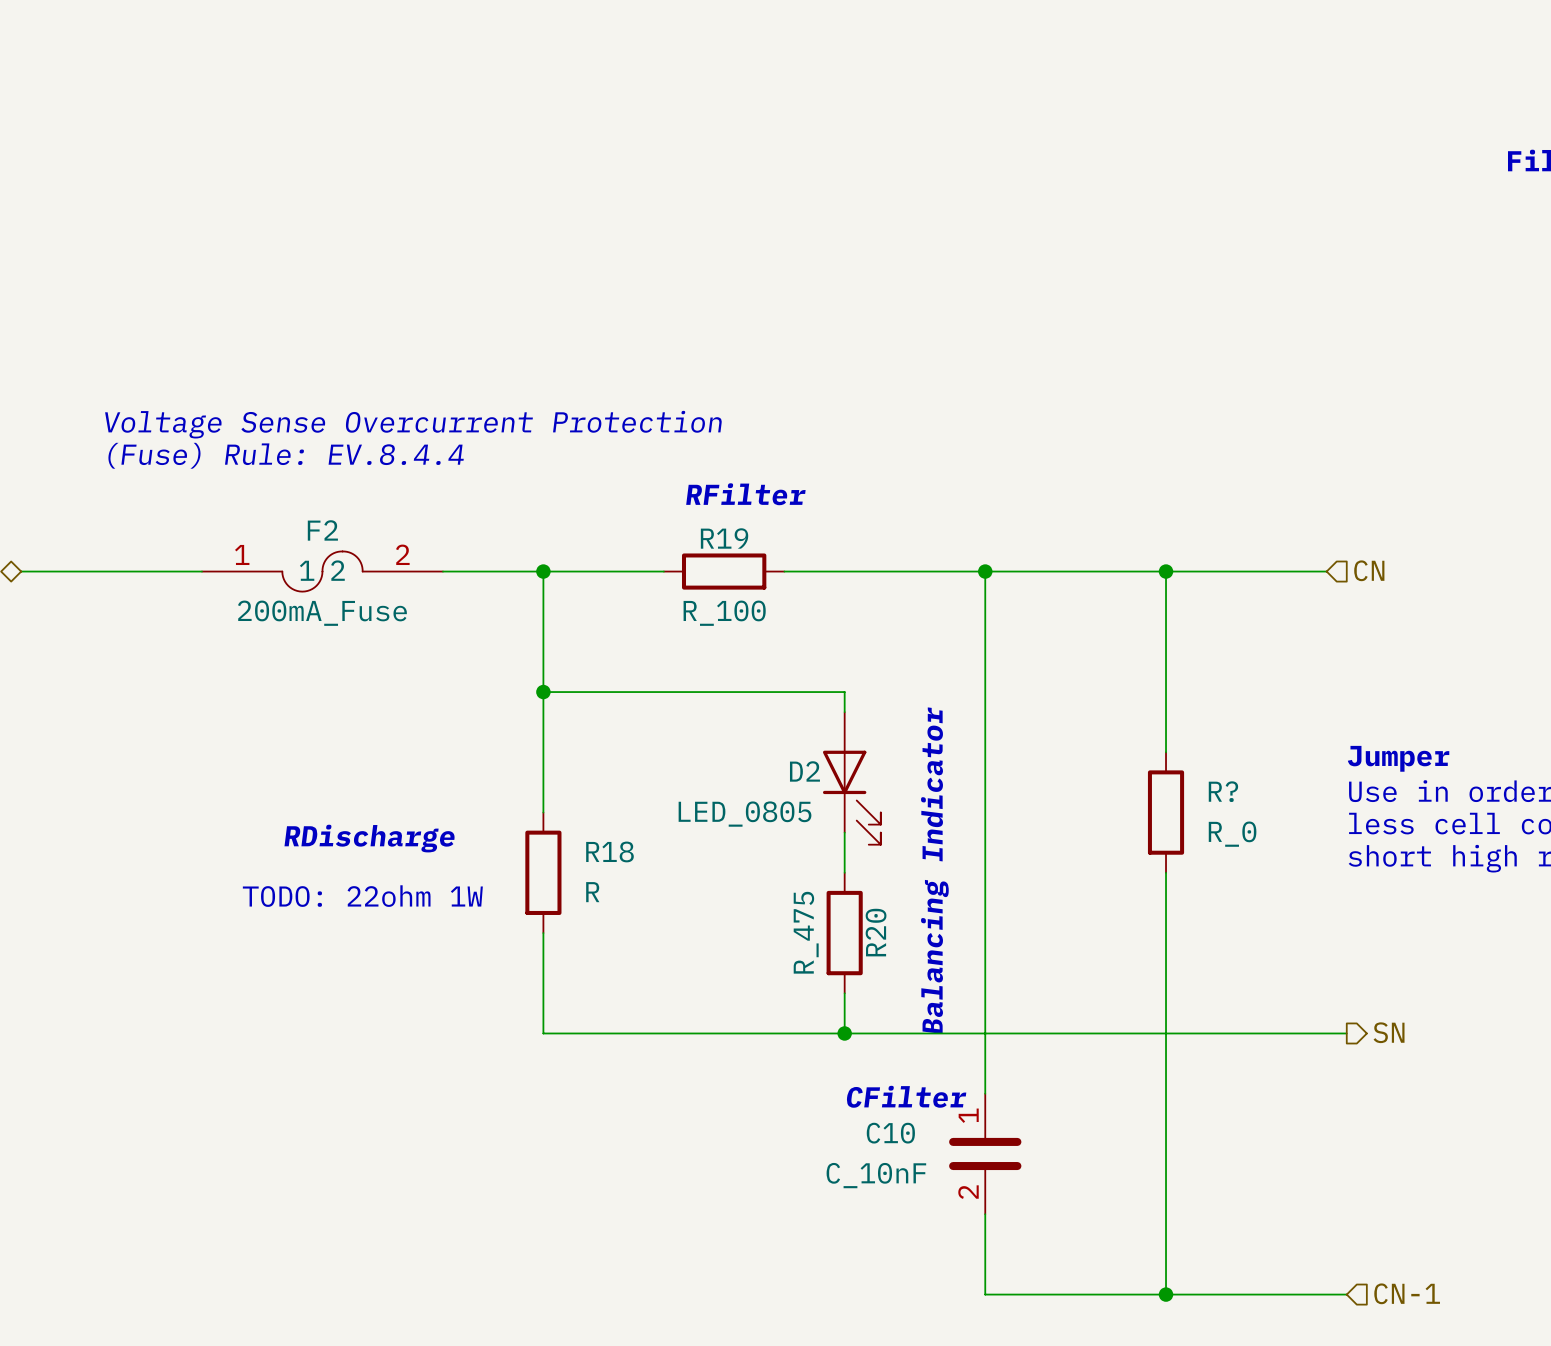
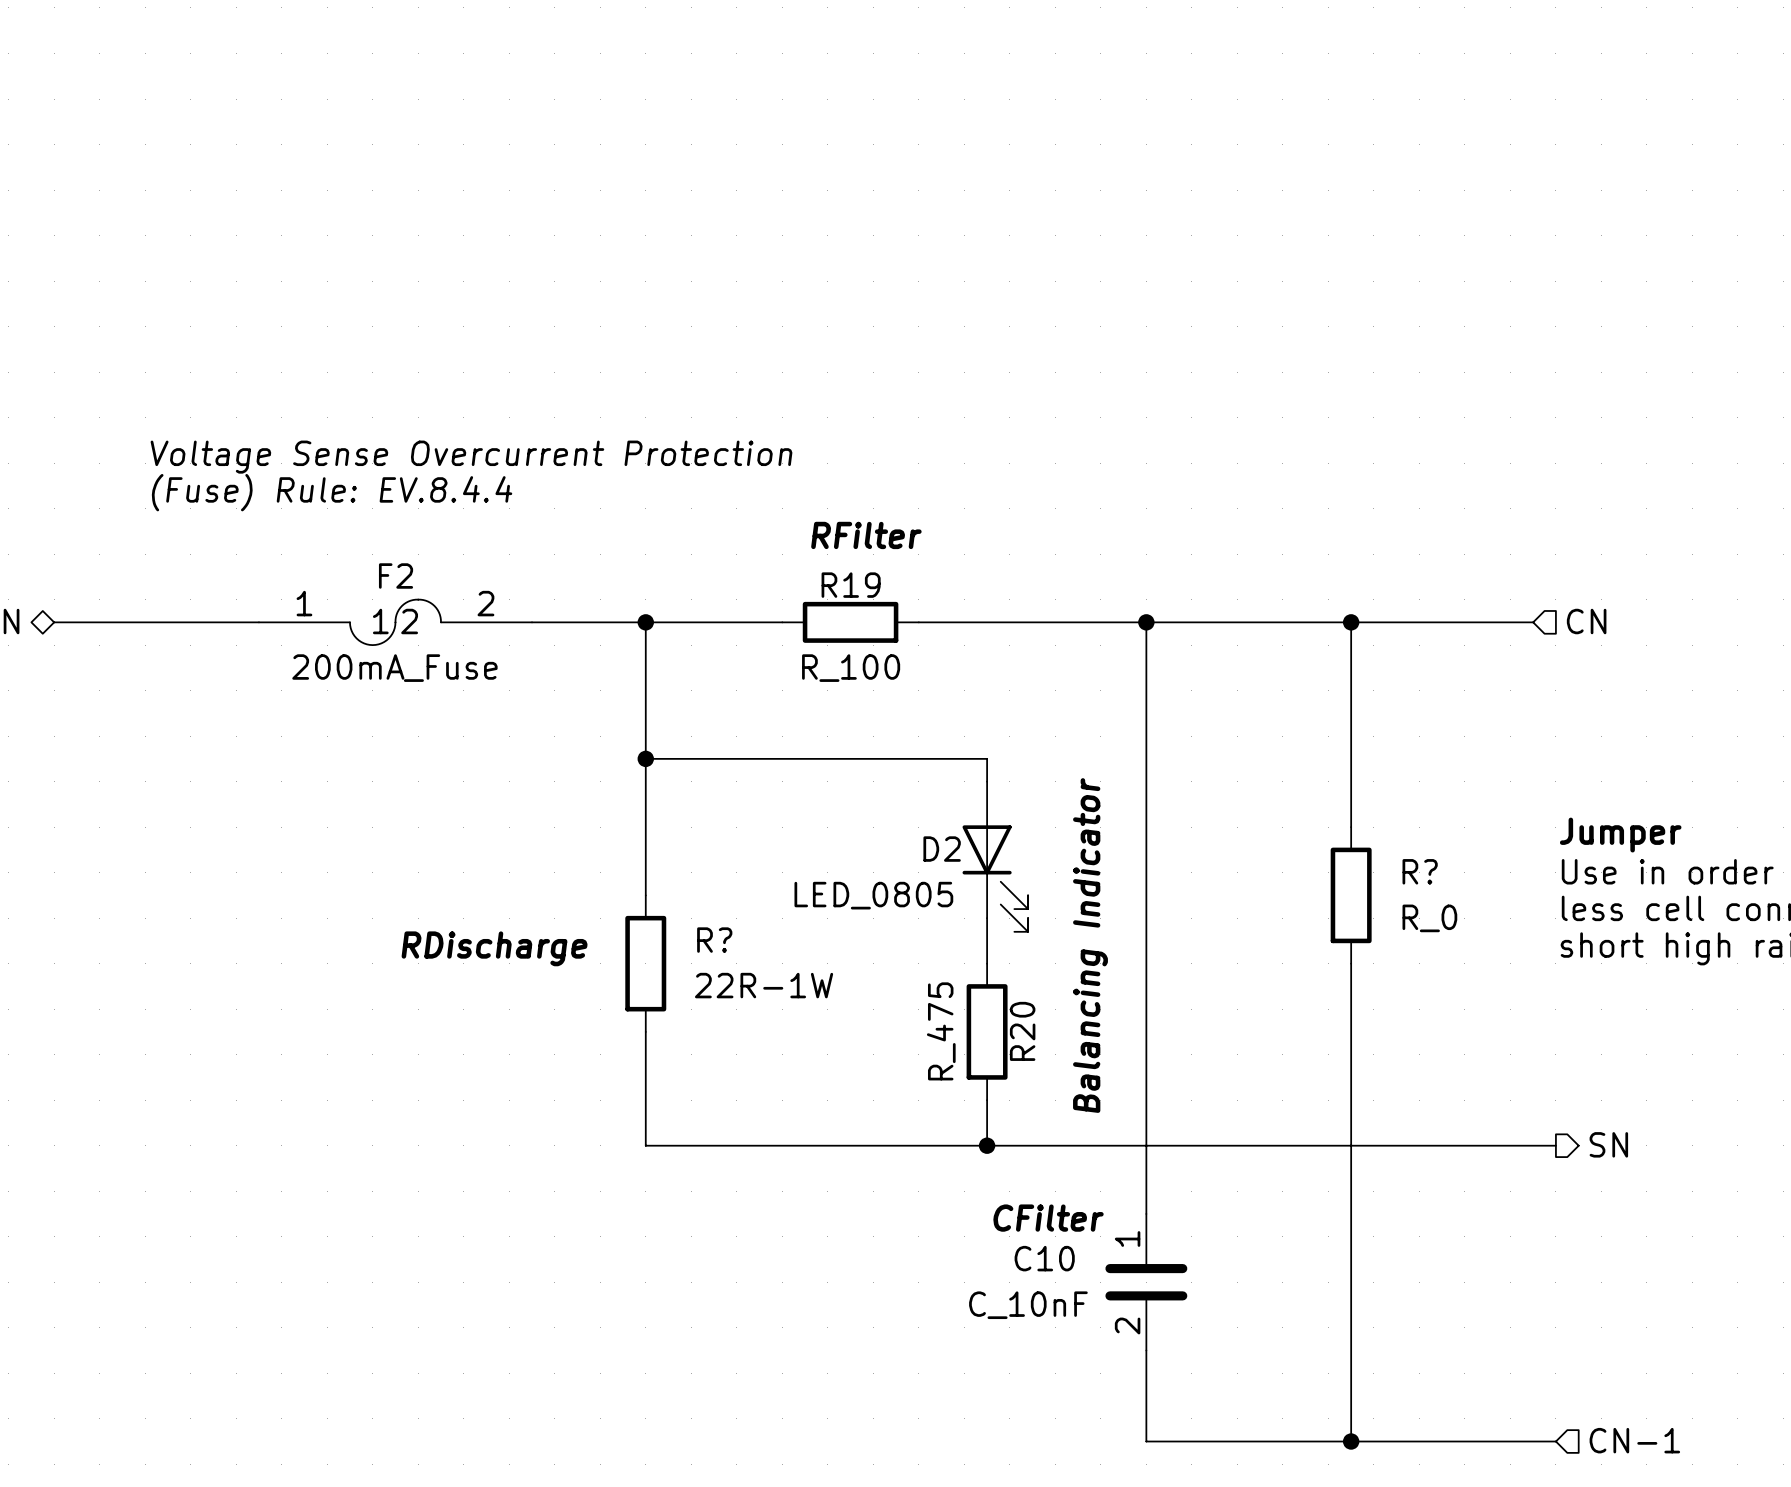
text position: RDischarge (369, 838) -> RDischarge (494, 948)
R18 name: R18 (609, 851) -> R? (714, 940)
R18 value: R (592, 892) -> 22R-1W (764, 985)
text: TODO: 22ohm 1W (362, 896) -> none

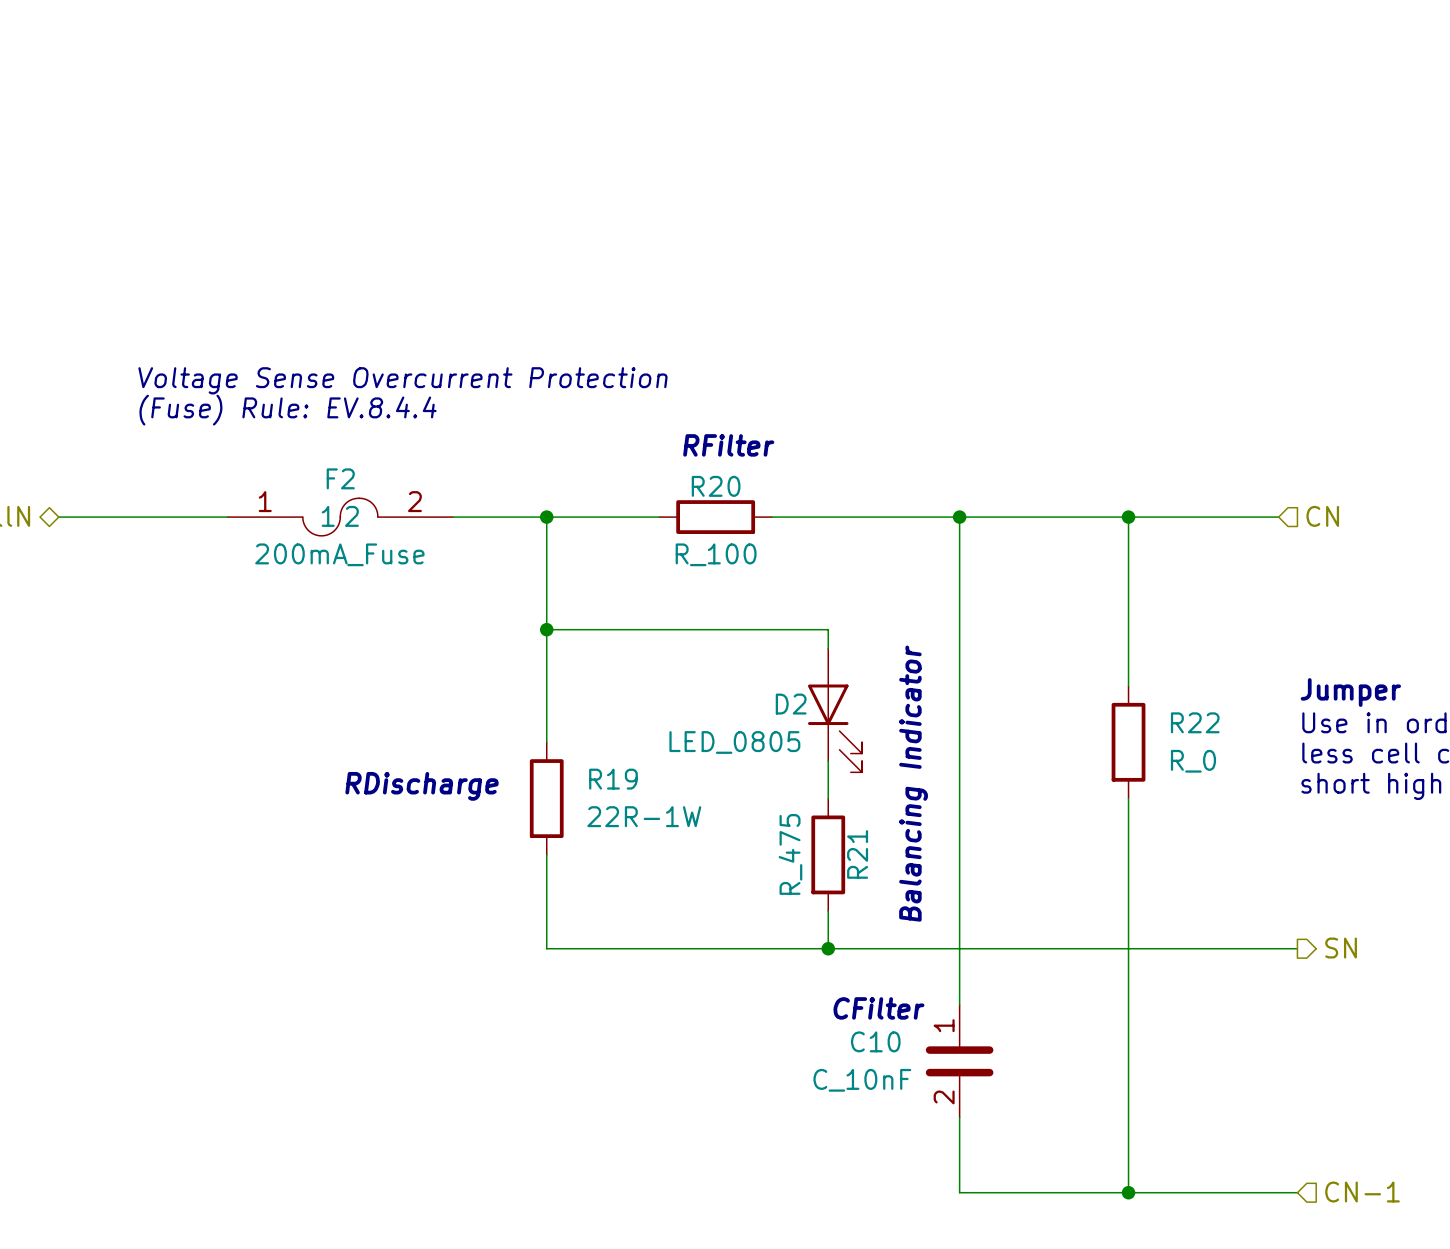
R19 name: R19 (851, 585) -> R20 (716, 486)
R? name: R? (1420, 871) -> R22 (1195, 722)
R? name: R? (714, 940) -> R19 (613, 779)
R20 name: R20 (1022, 1031) -> R21 (857, 854)

